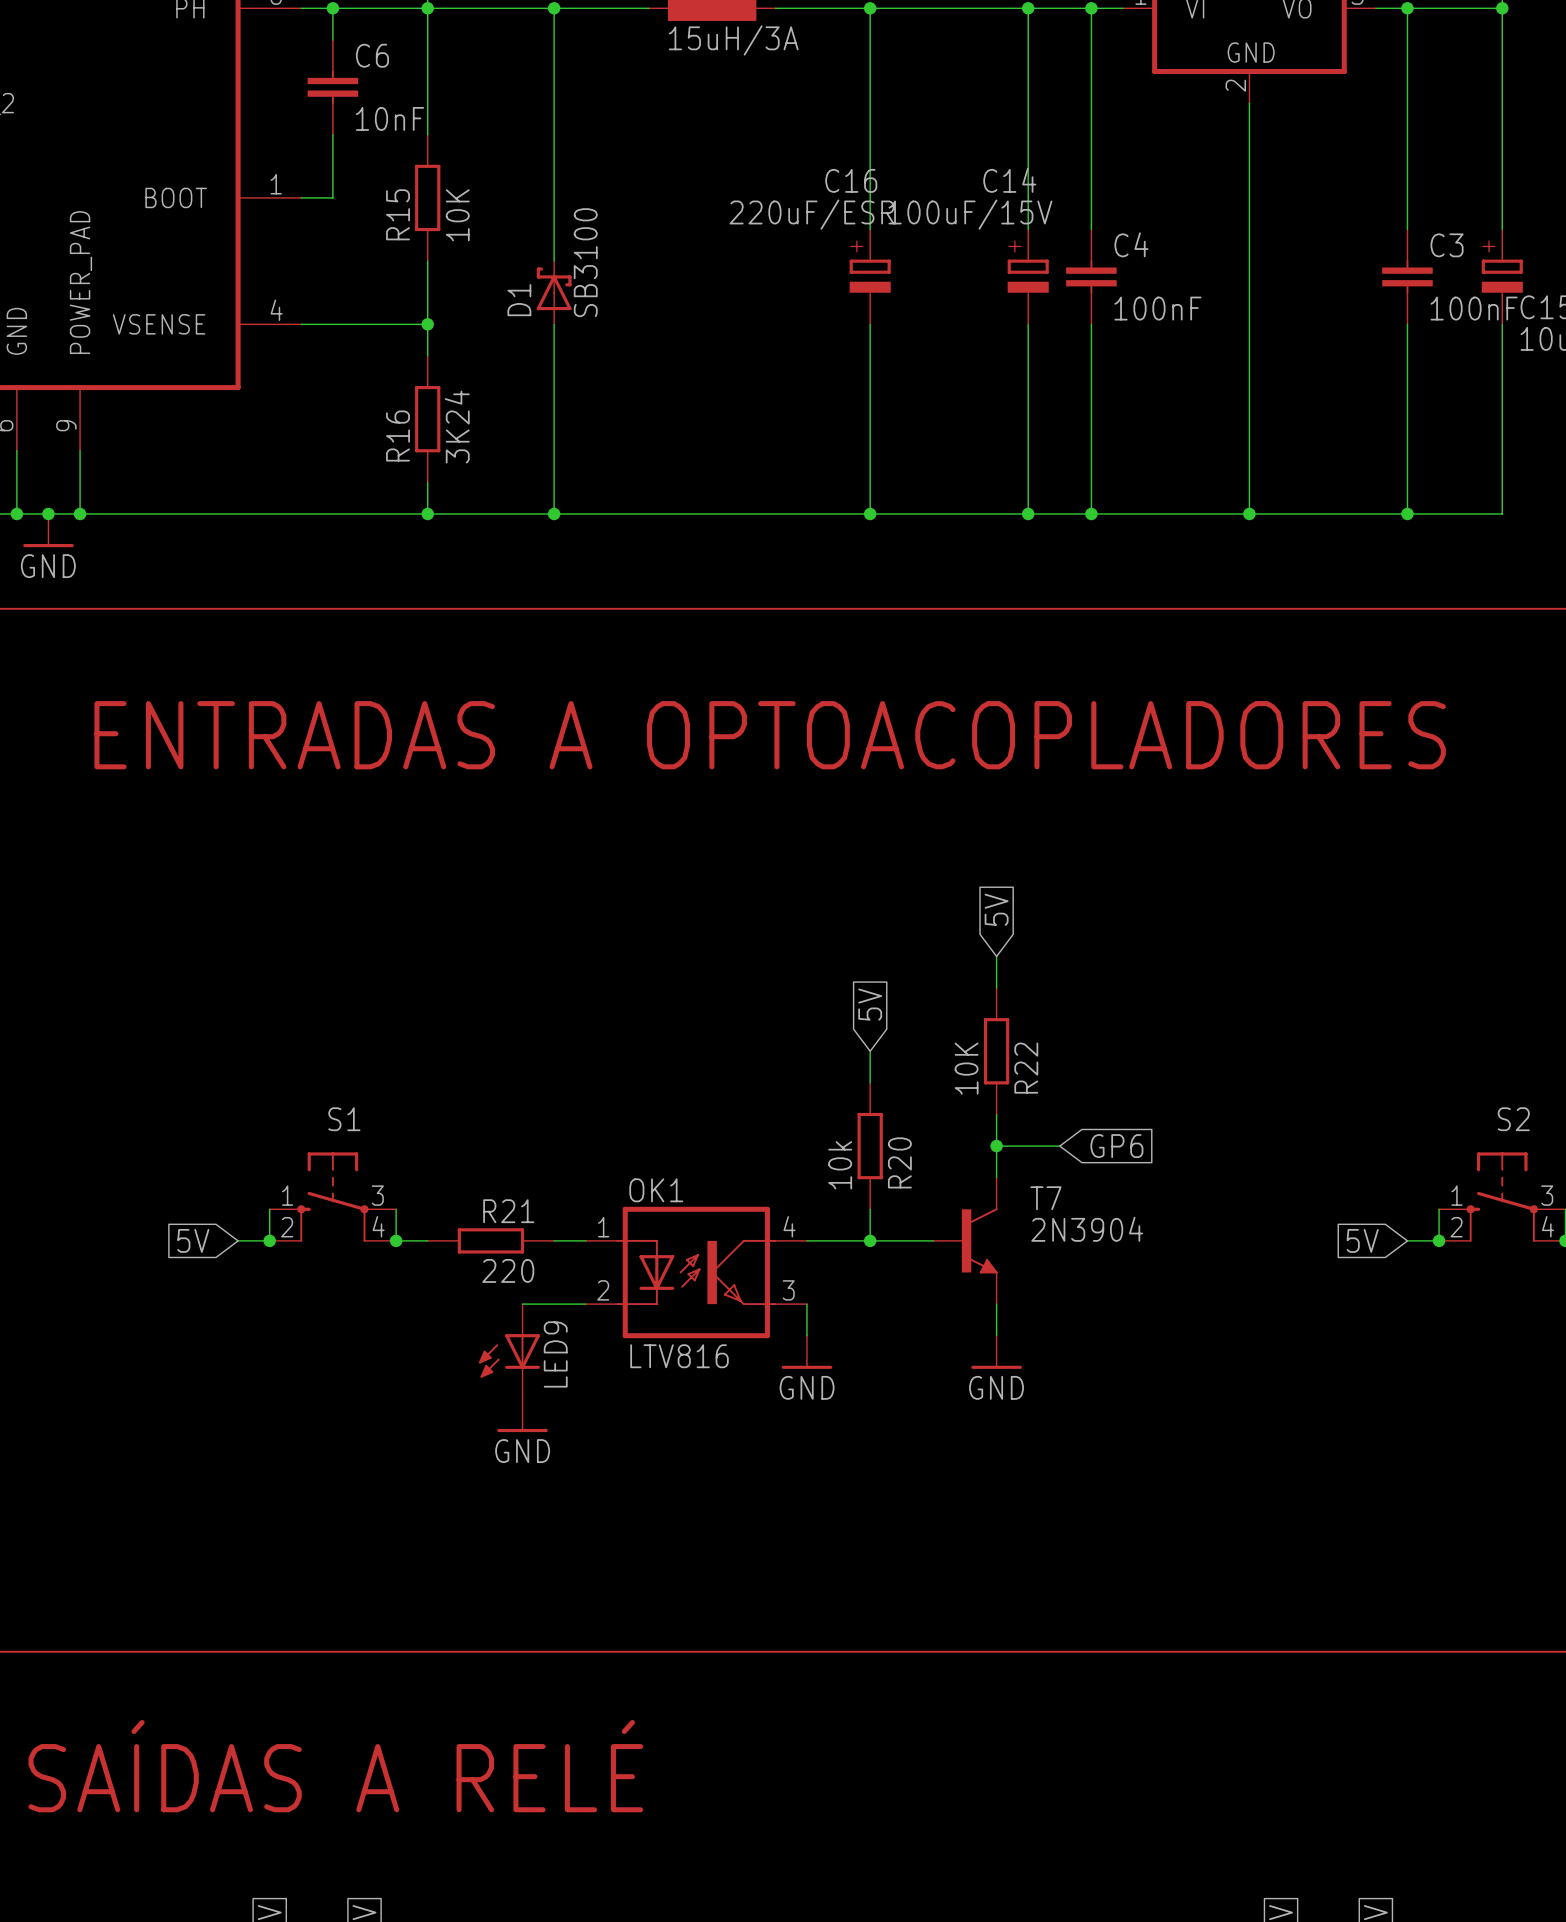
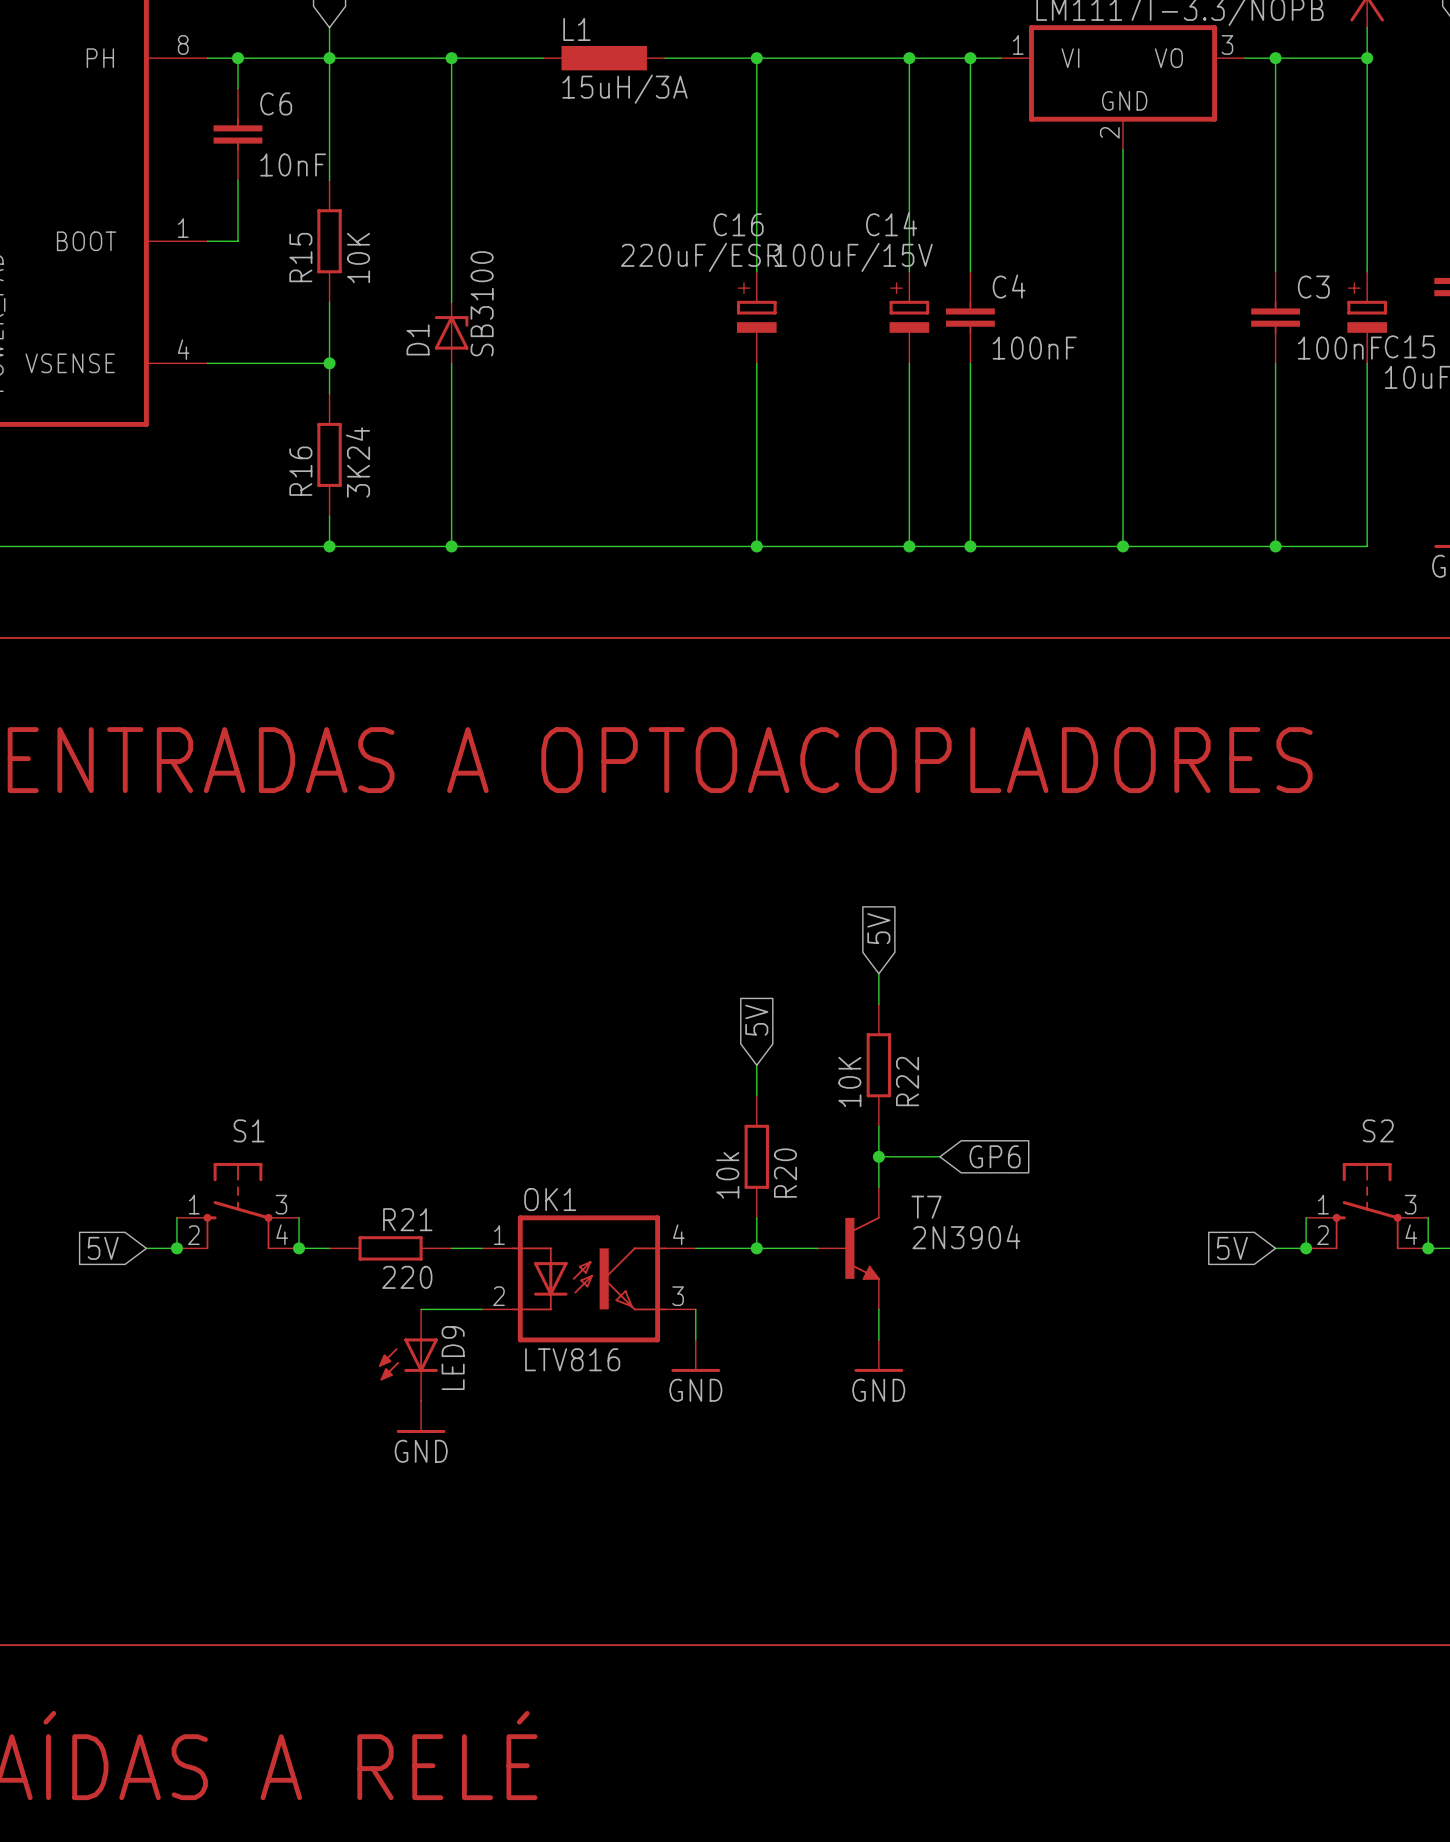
D1 symbol: [536, 261, 572, 325] -> [434, 302, 469, 364]

